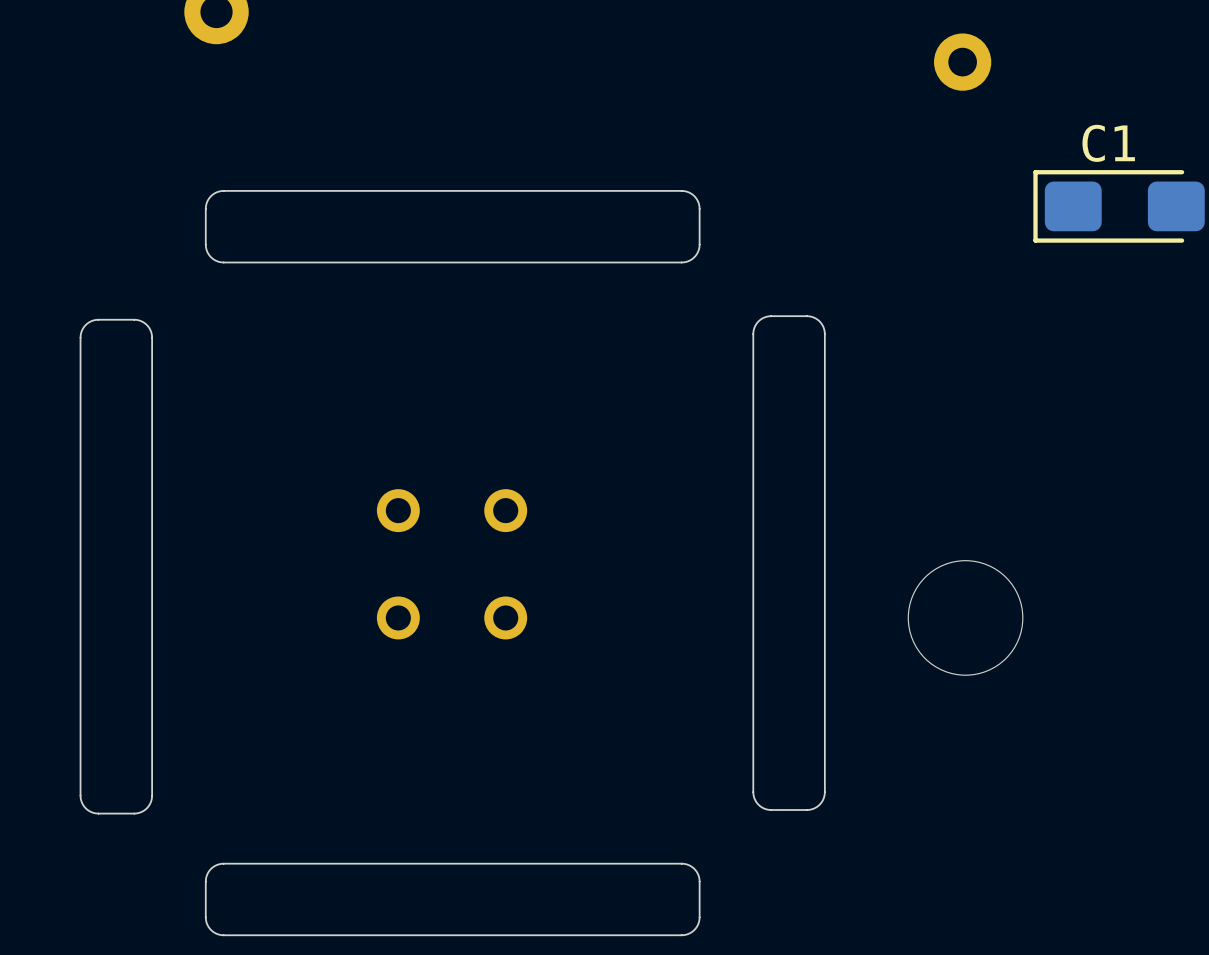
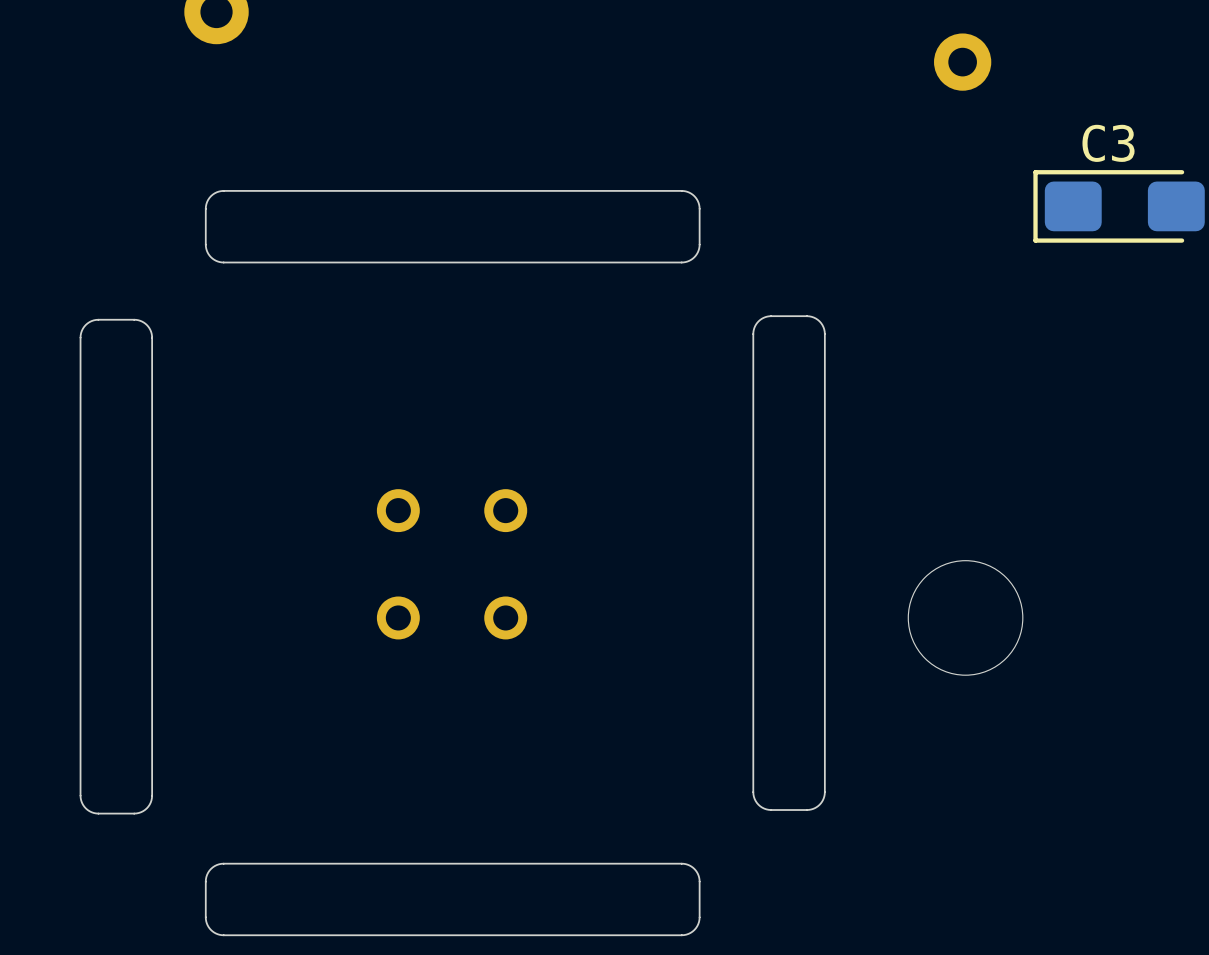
C1 name: C1 (1108, 143) -> C3 (1108, 143)

